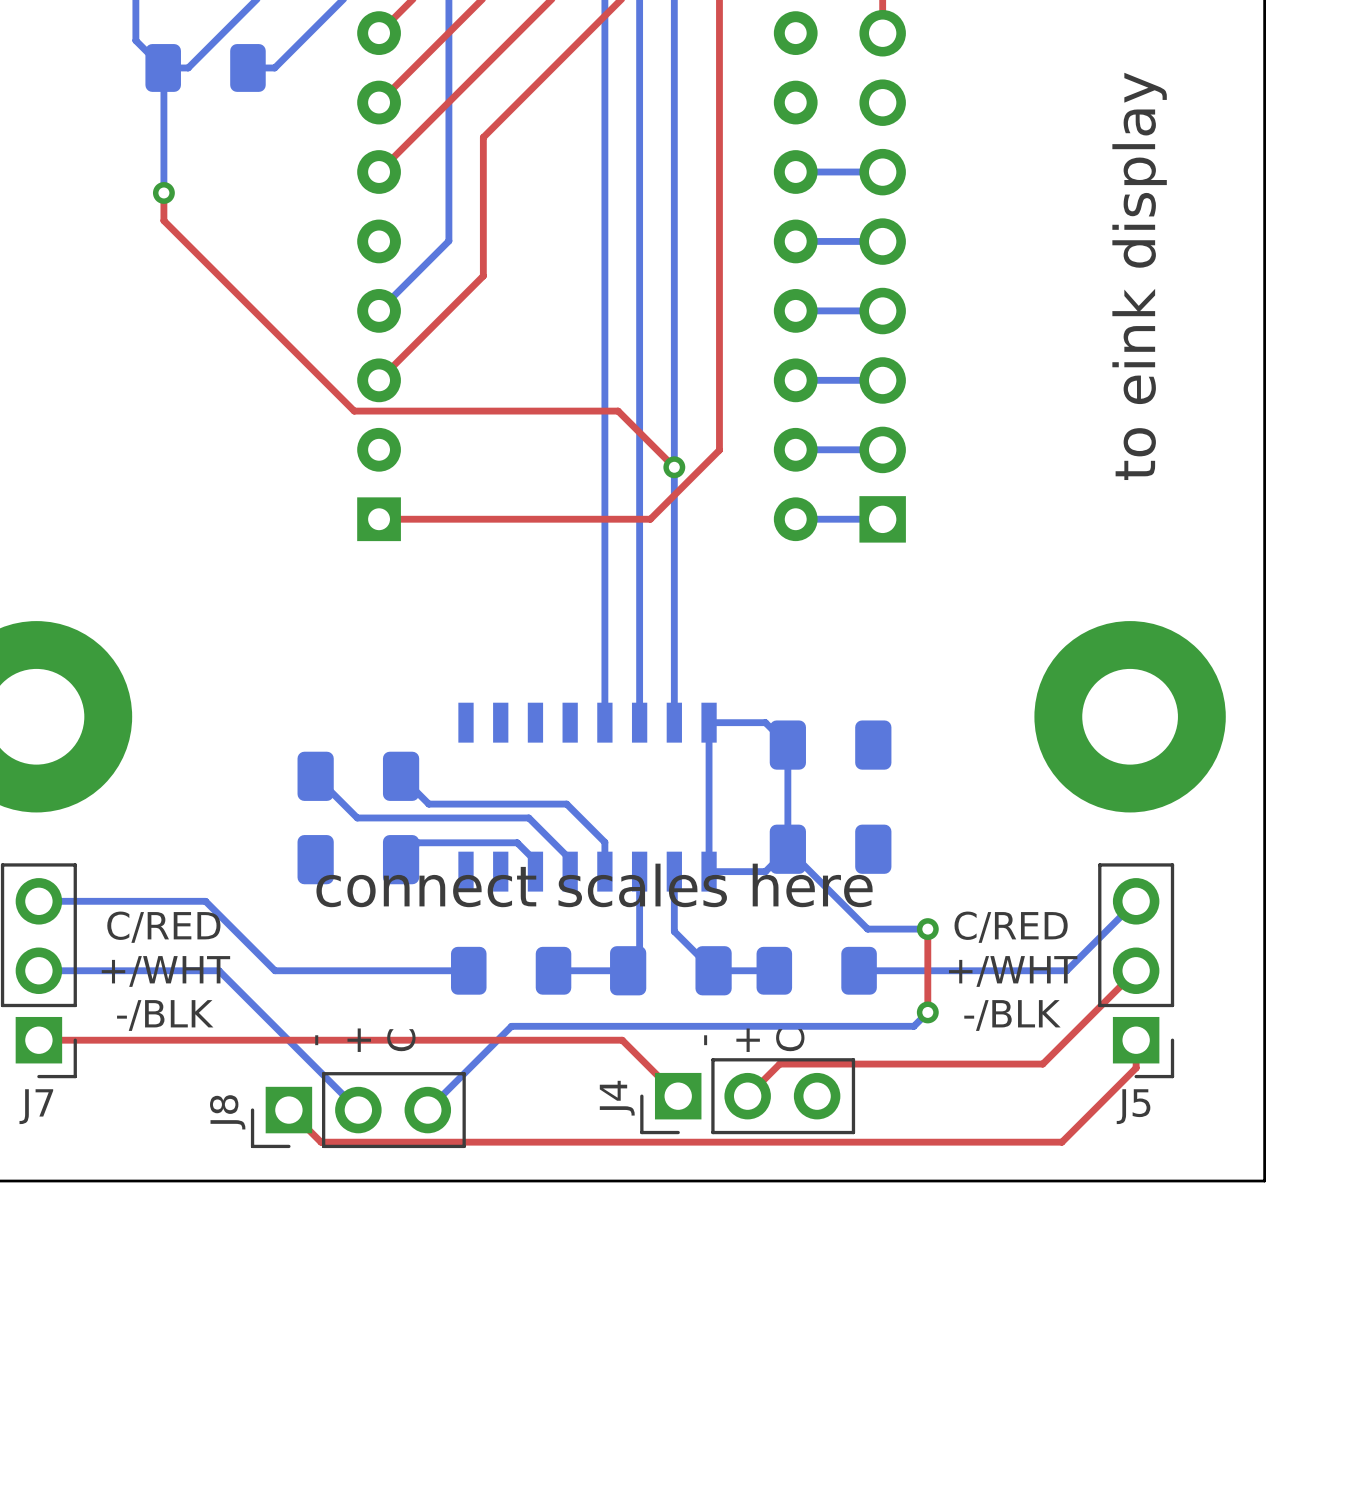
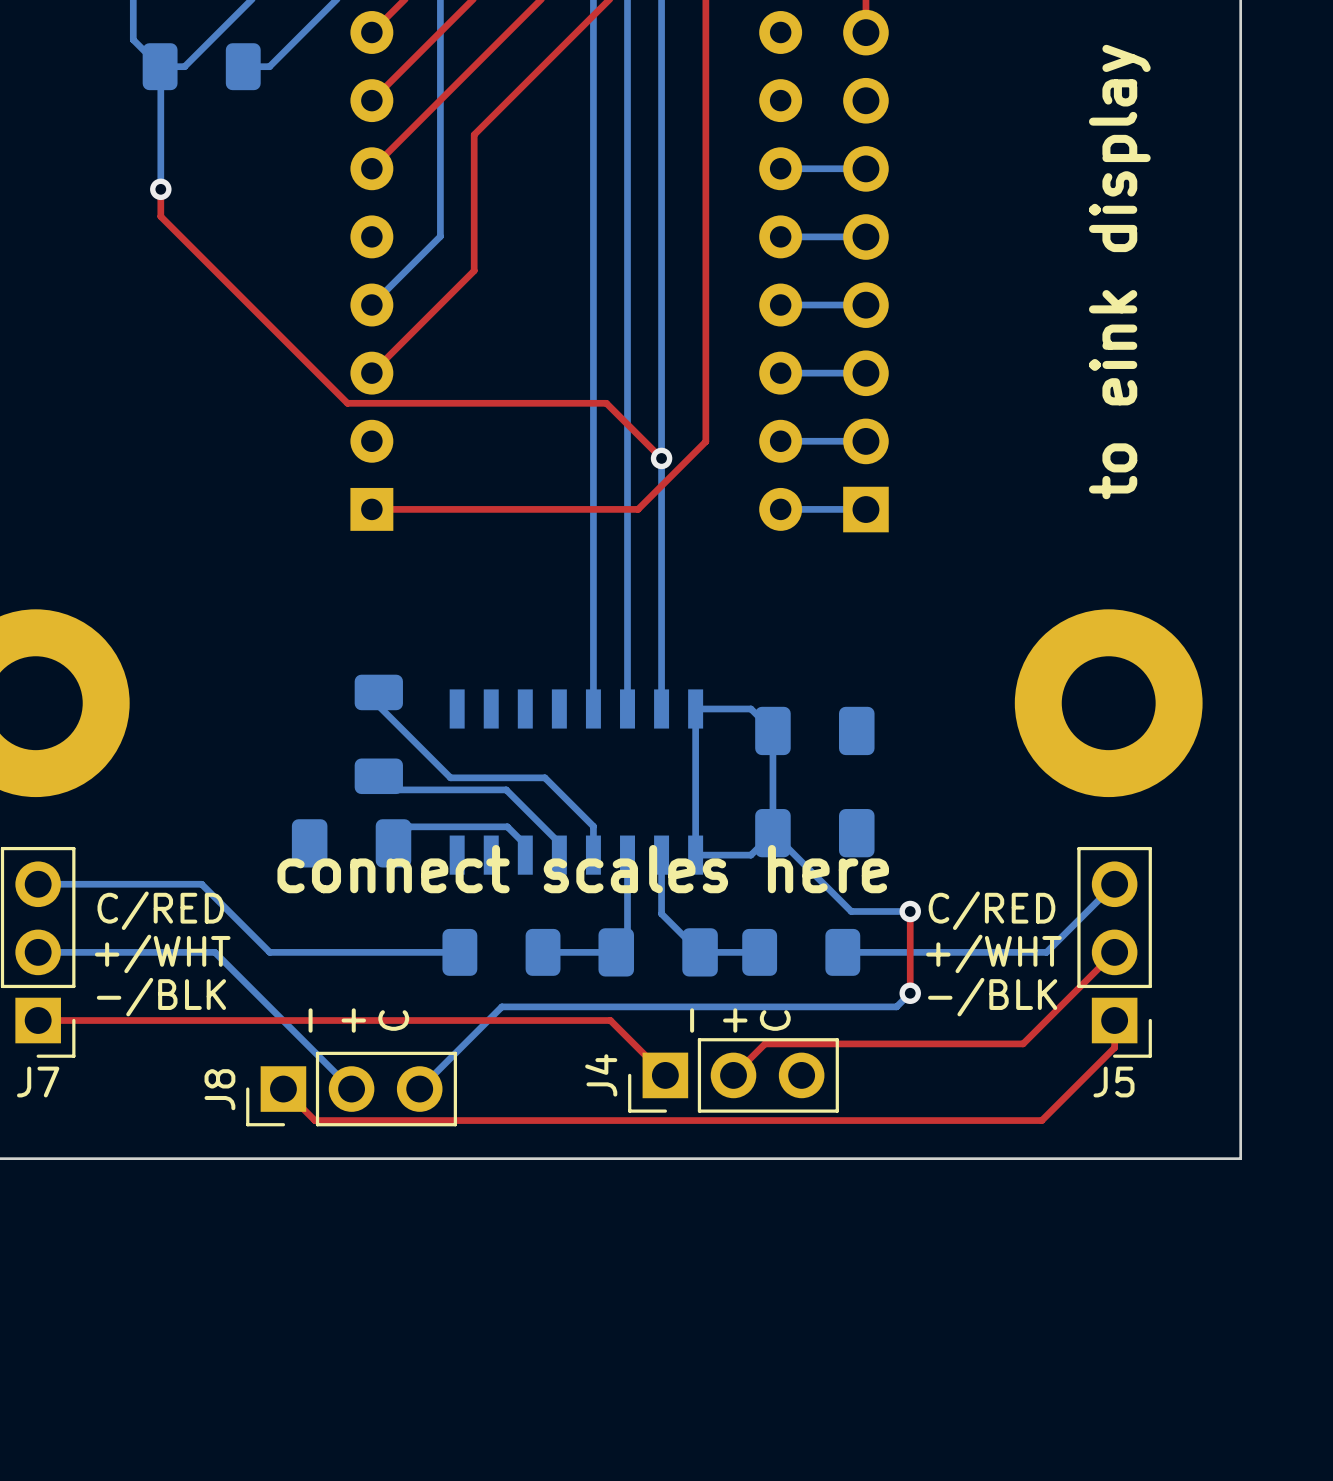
bottom track: (315, 776) (357, 817) (528, 817) -> (378, 789) (506, 789) (518, 802)
part rotation: 0° (358, 776) -> 90° clockwise (378, 734)
bottom track: (401, 776) (428, 804) (566, 804) -> (378, 706) (450, 777) (544, 777) (555, 788)

